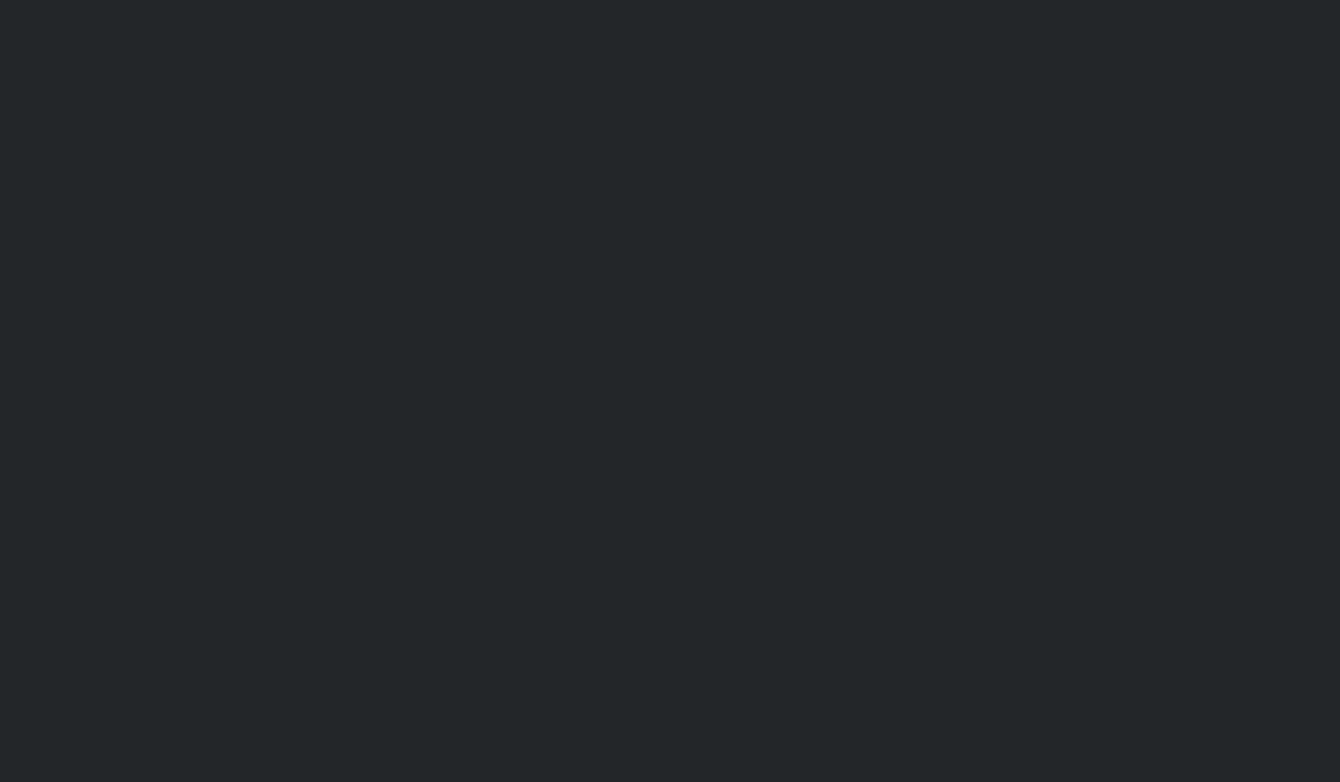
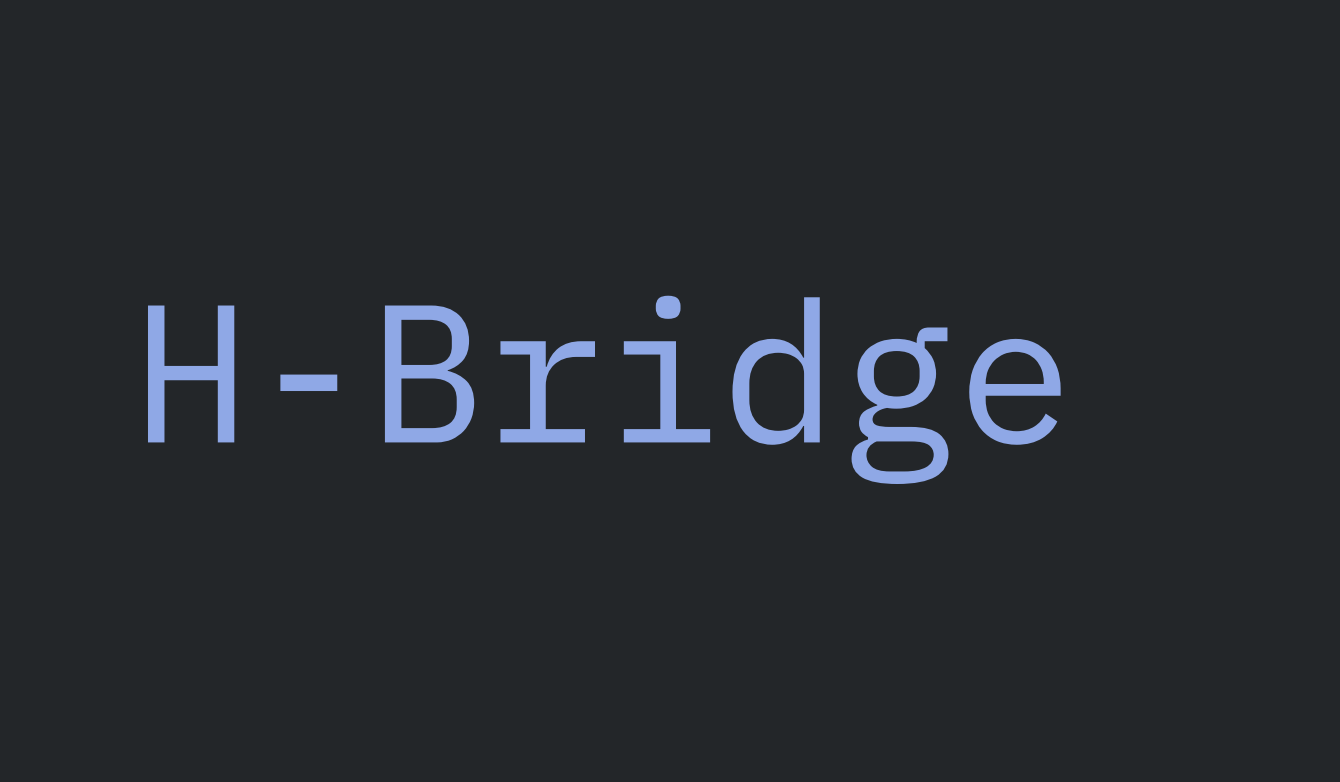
text: none -> H-Bridge (604, 389)

